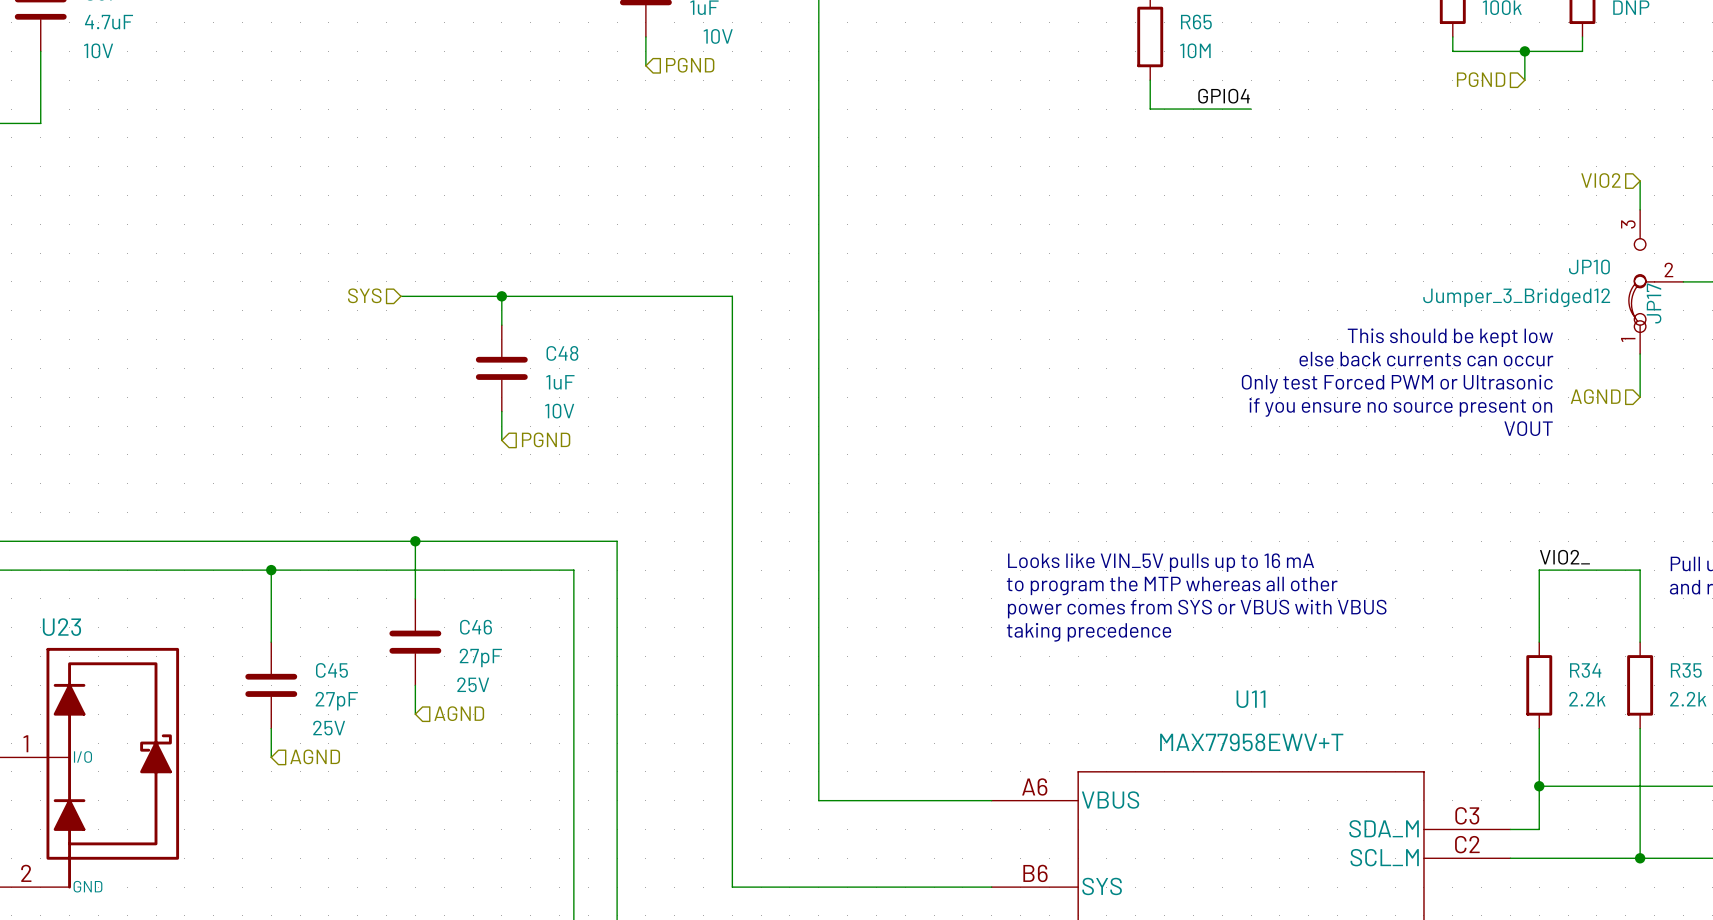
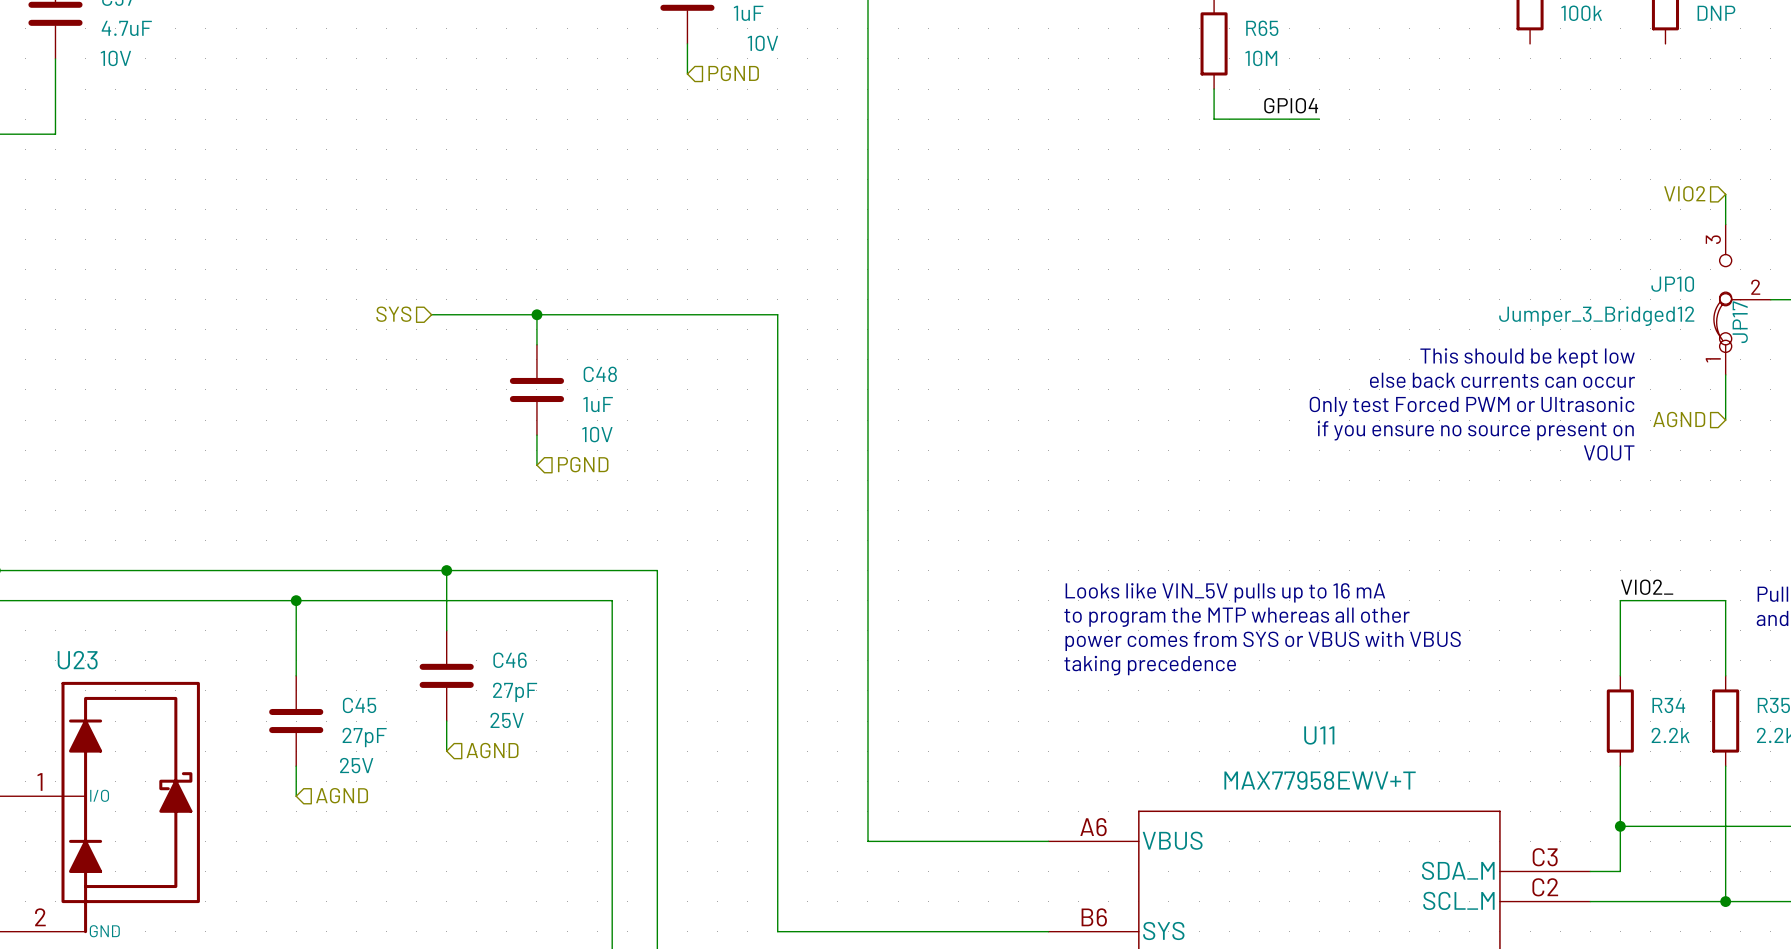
wire: (1452, 36) (1452, 51) (1582, 51) (1582, 36) -> none
wire: (1524, 51) (1524, 80) -> none
junction: (1524, 51) -> none
hierarchical label: PGND (1481, 79) -> none

